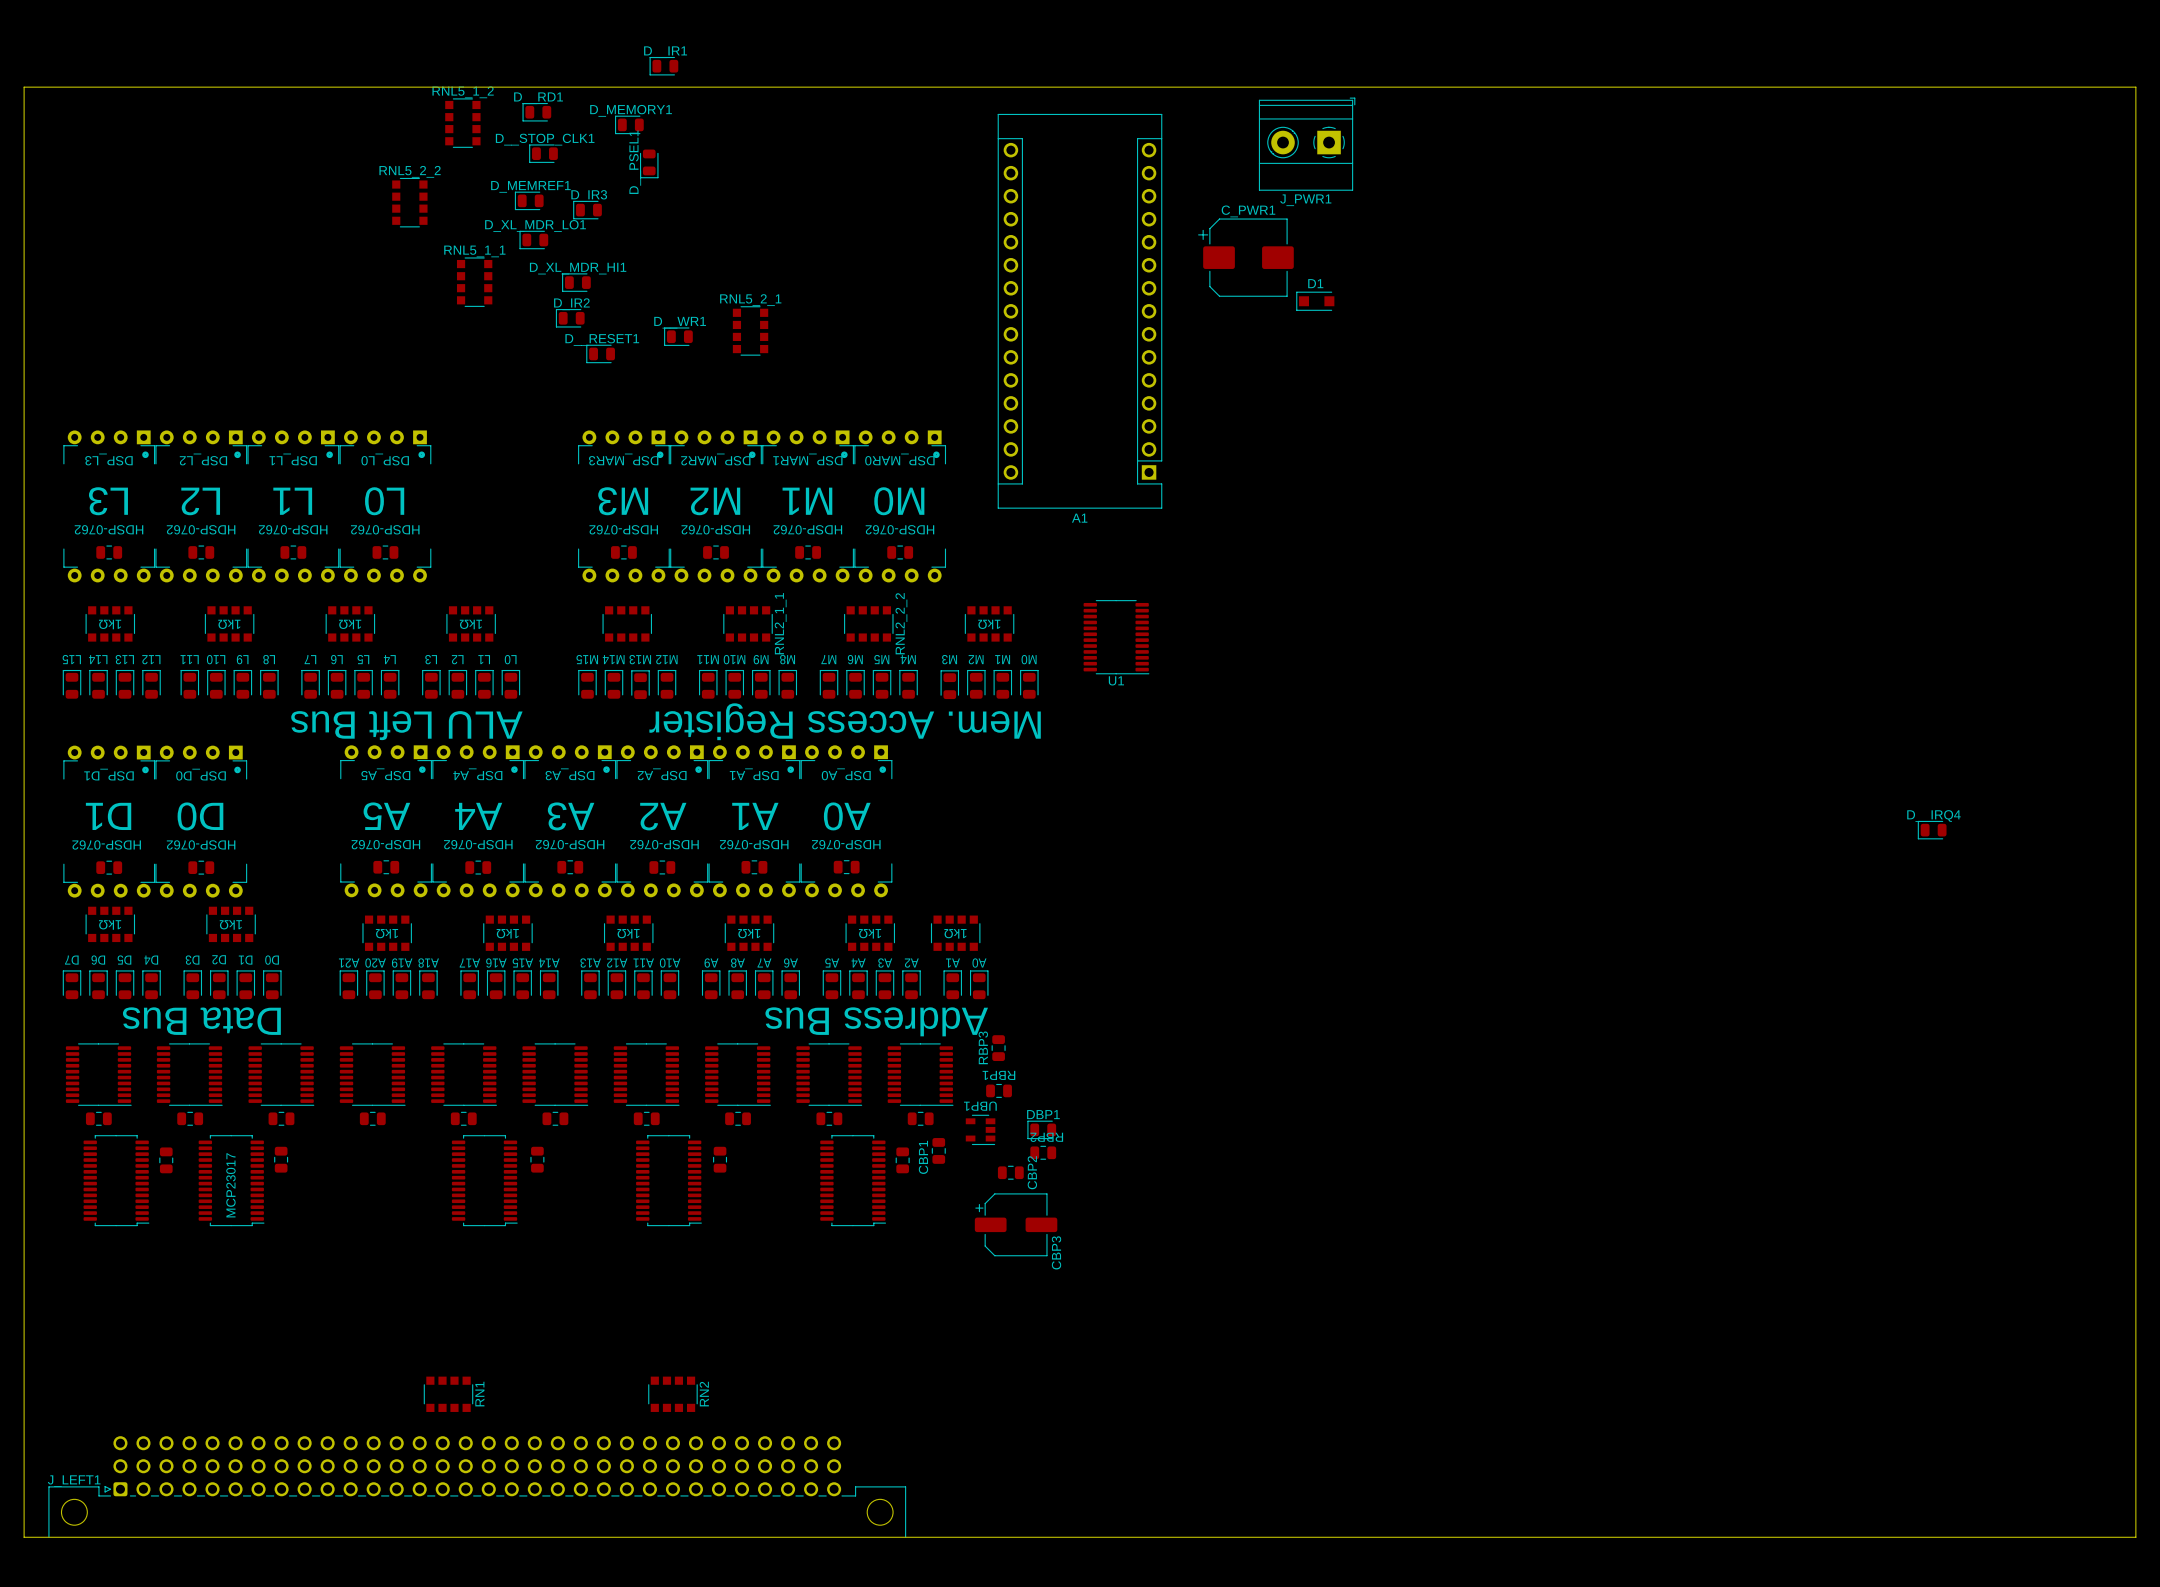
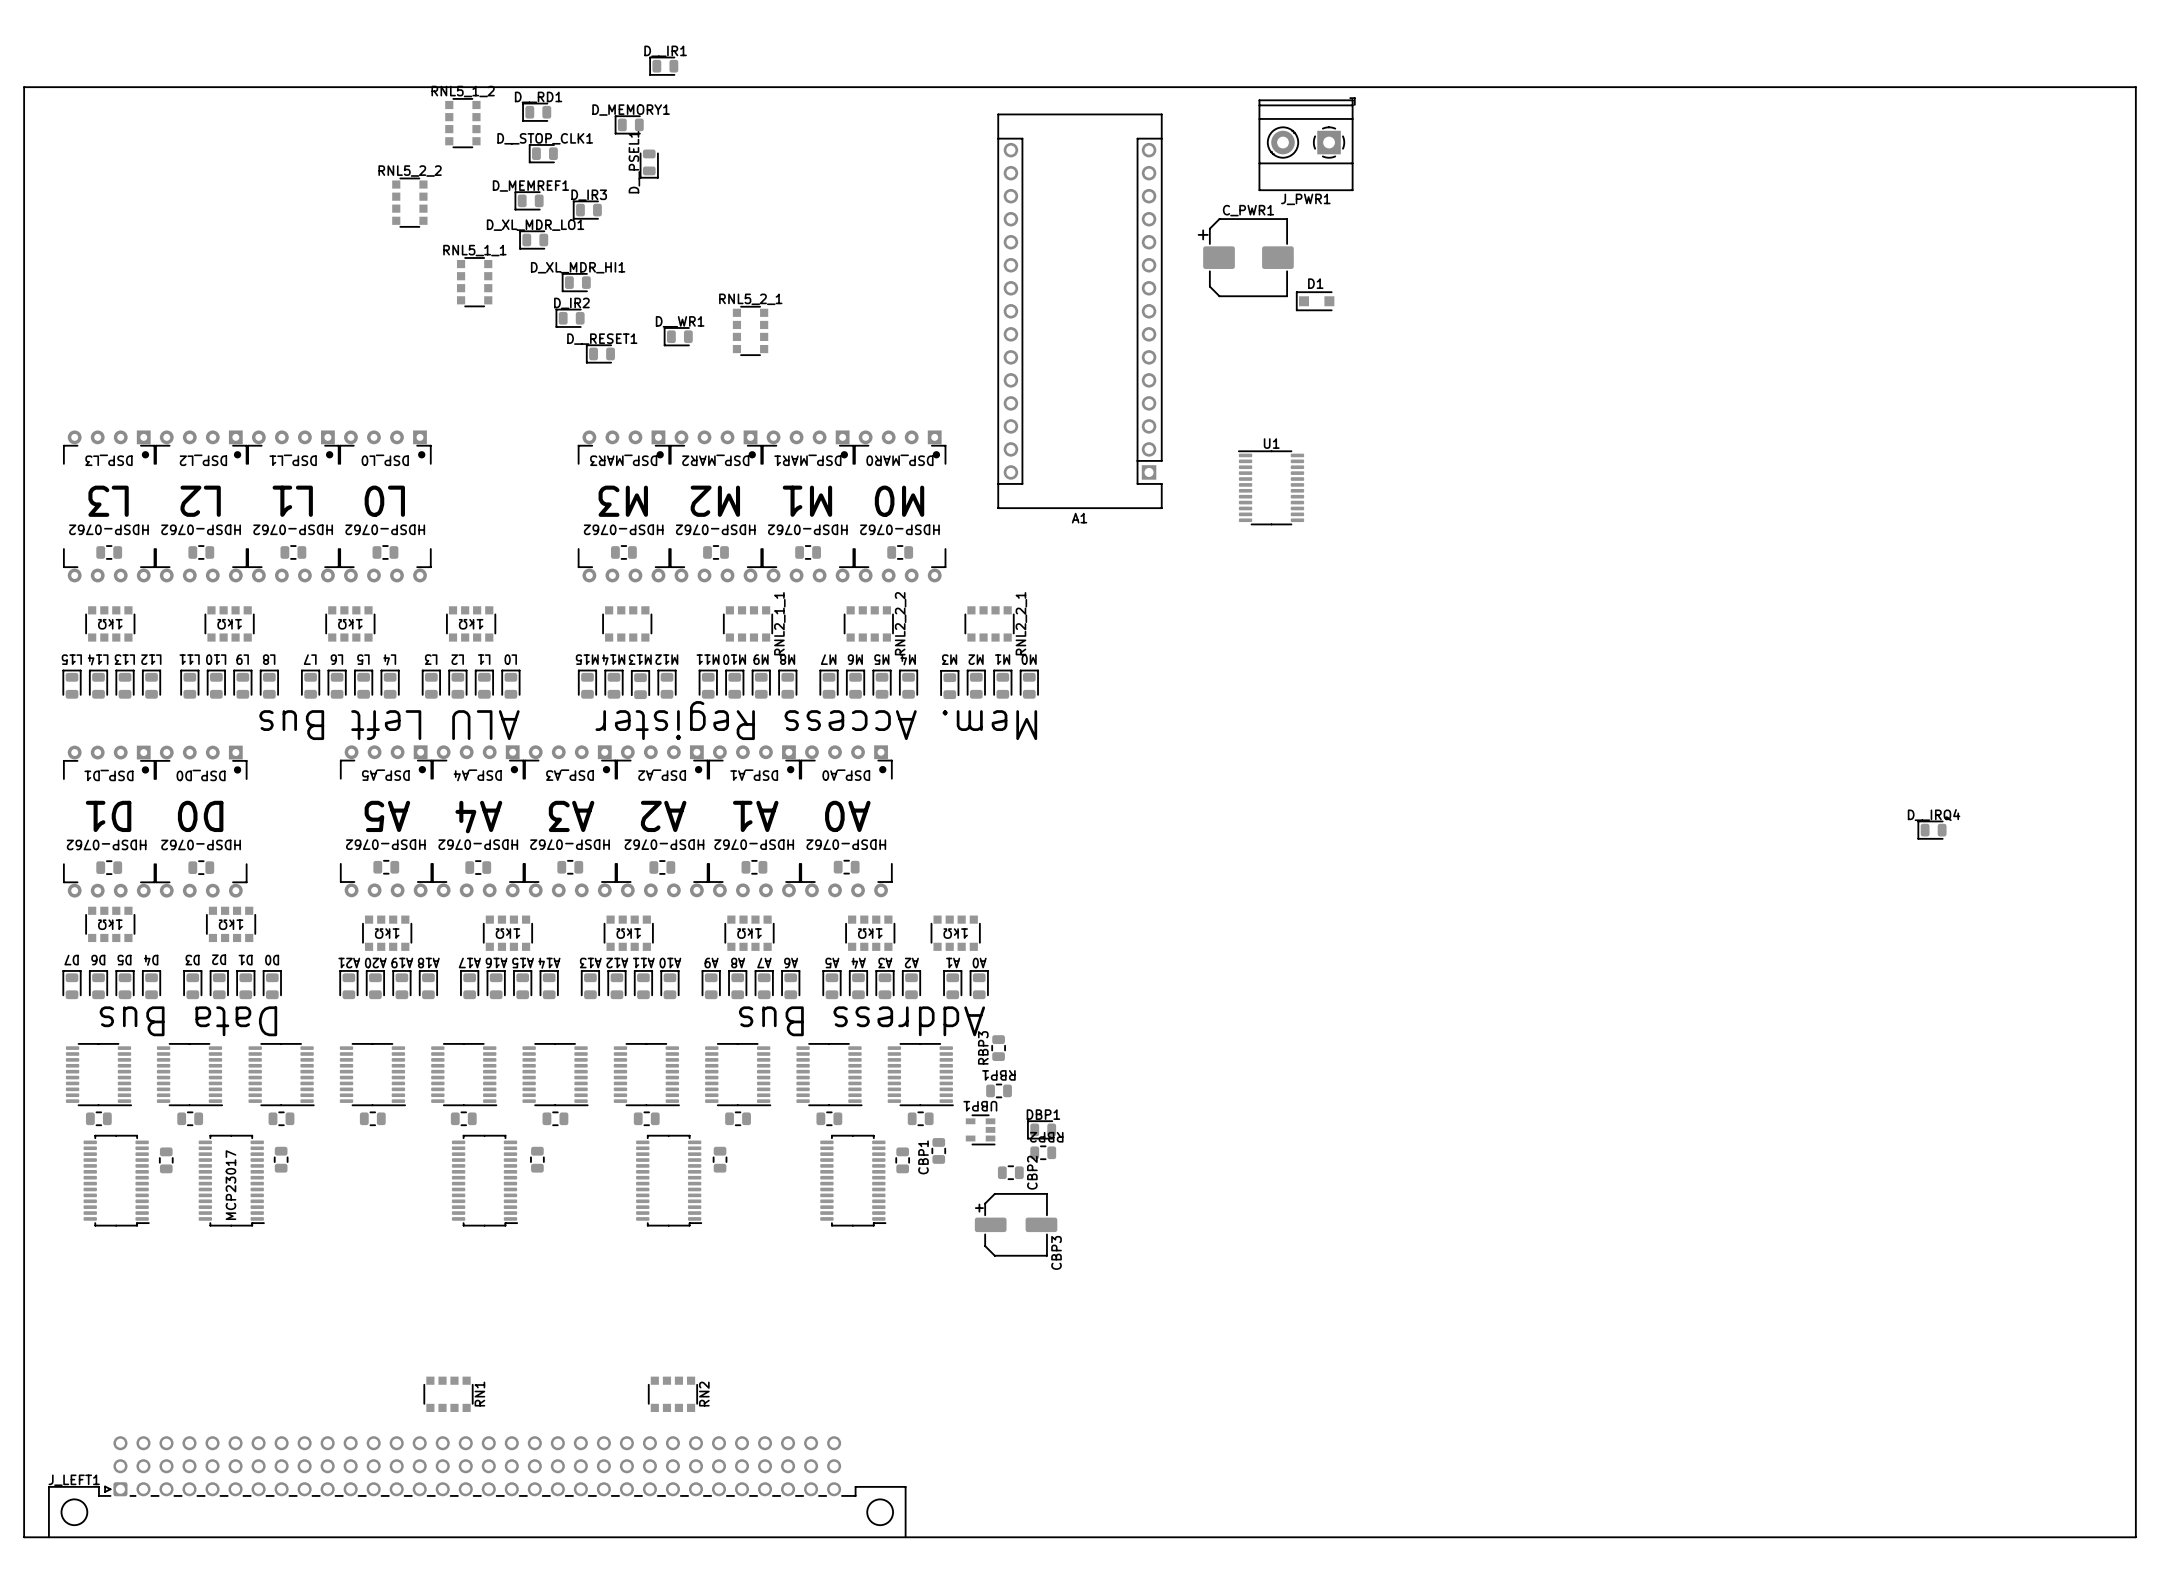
RNL2_2_1 name: none -> RNL2_2_1 (1021, 623)
RNL2_2_1 value: 1kΩ (989, 624) -> none
U1 rotation: 0° (1116, 637) -> 180° (1271, 487)
U1 position: (1116, 637) -> (1271, 487)

